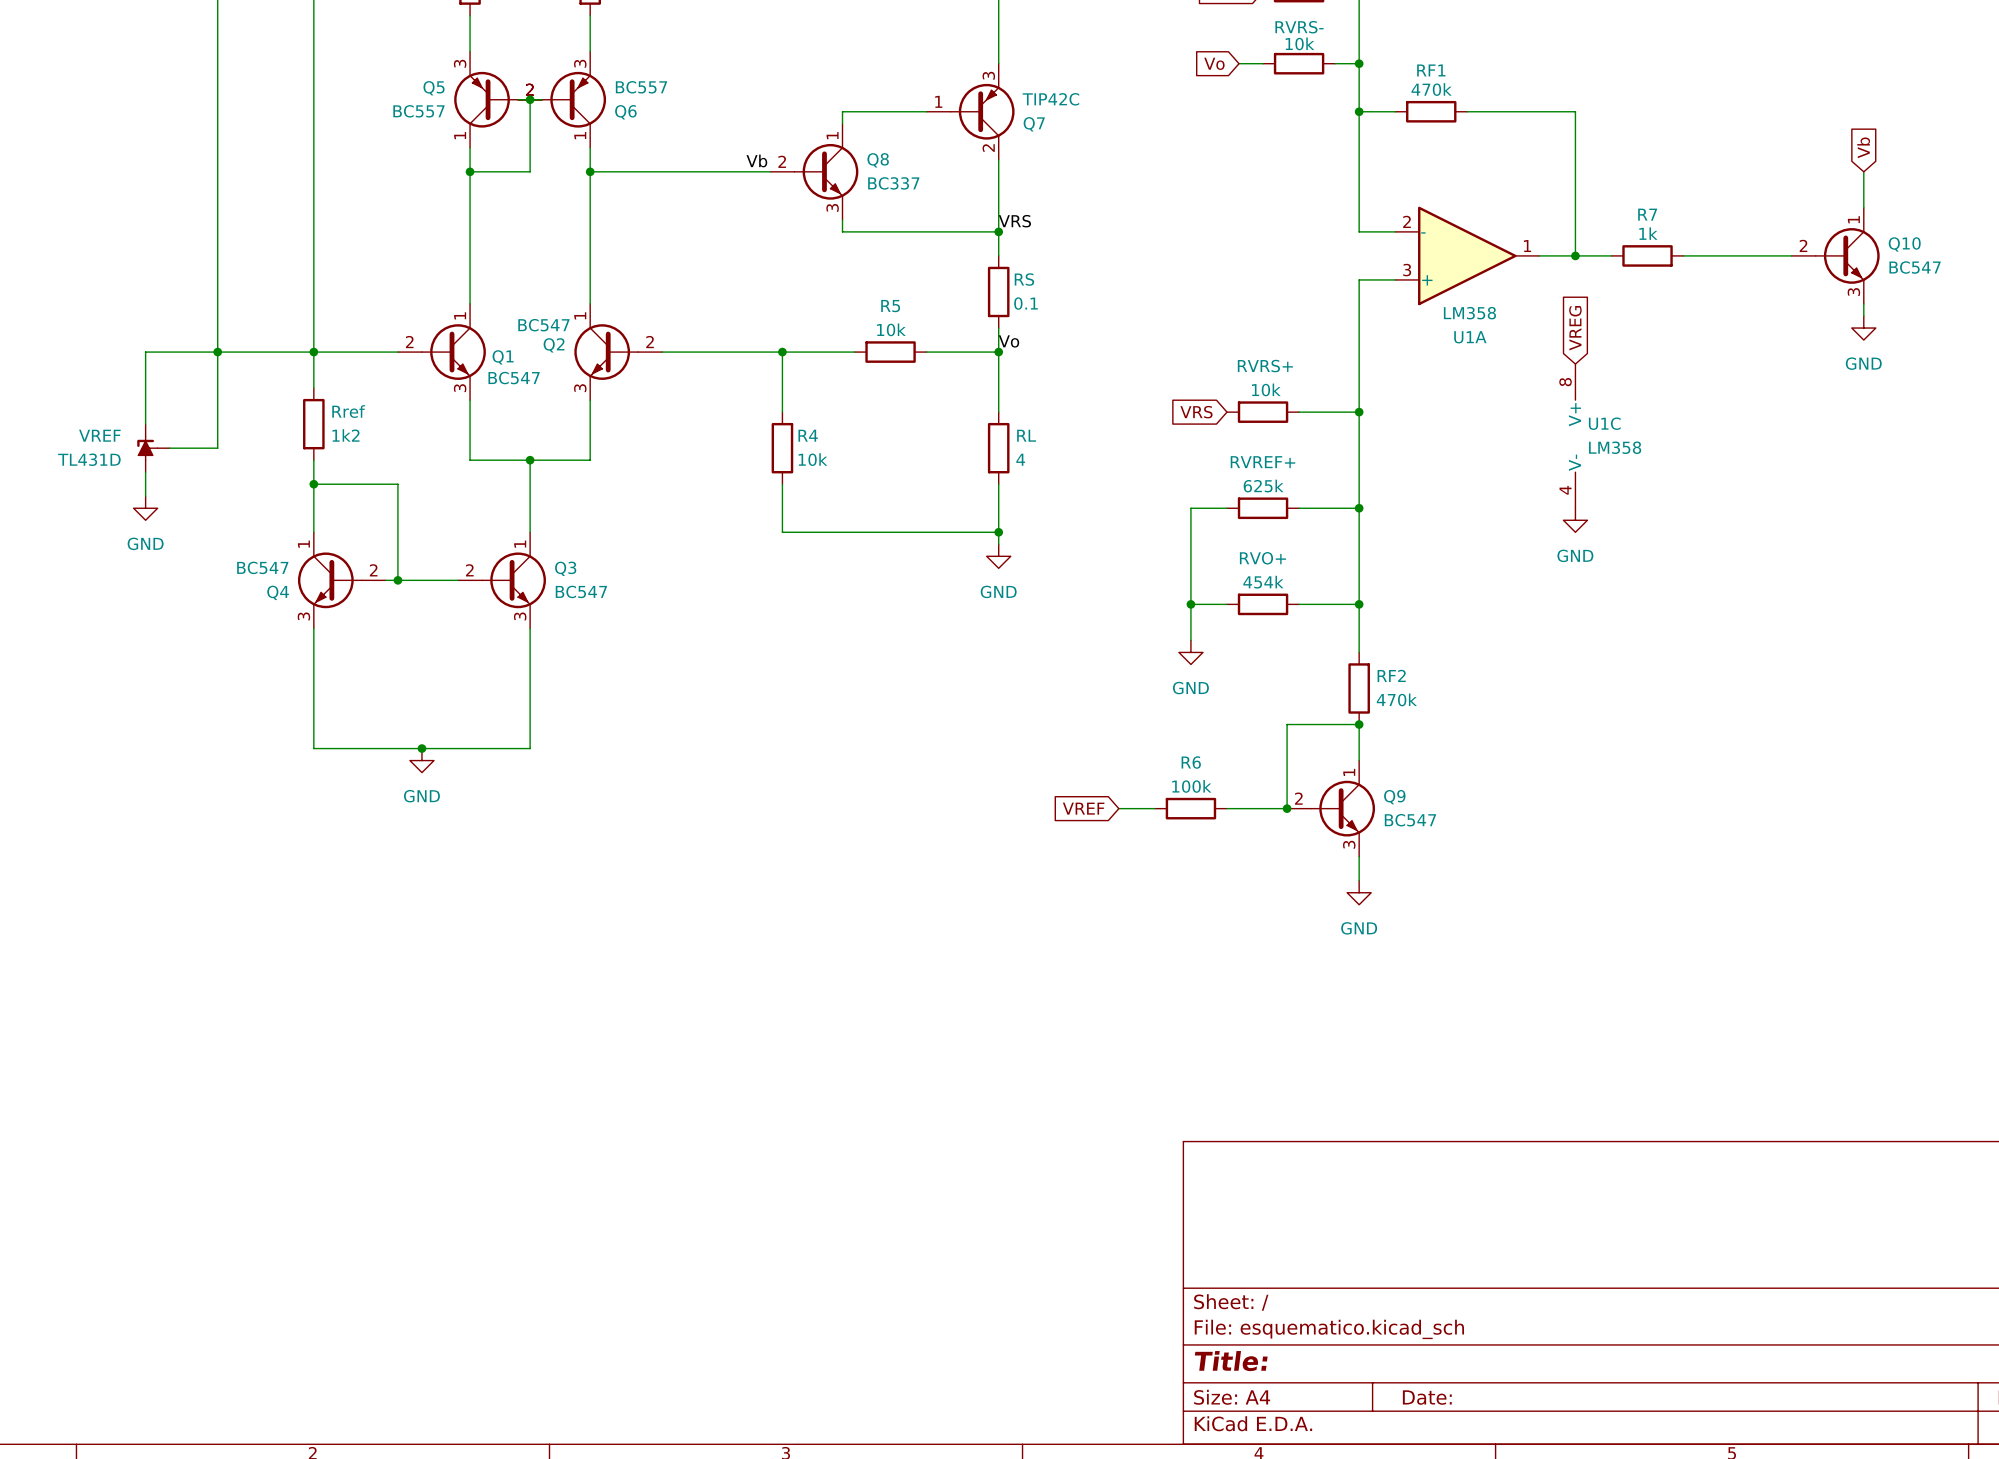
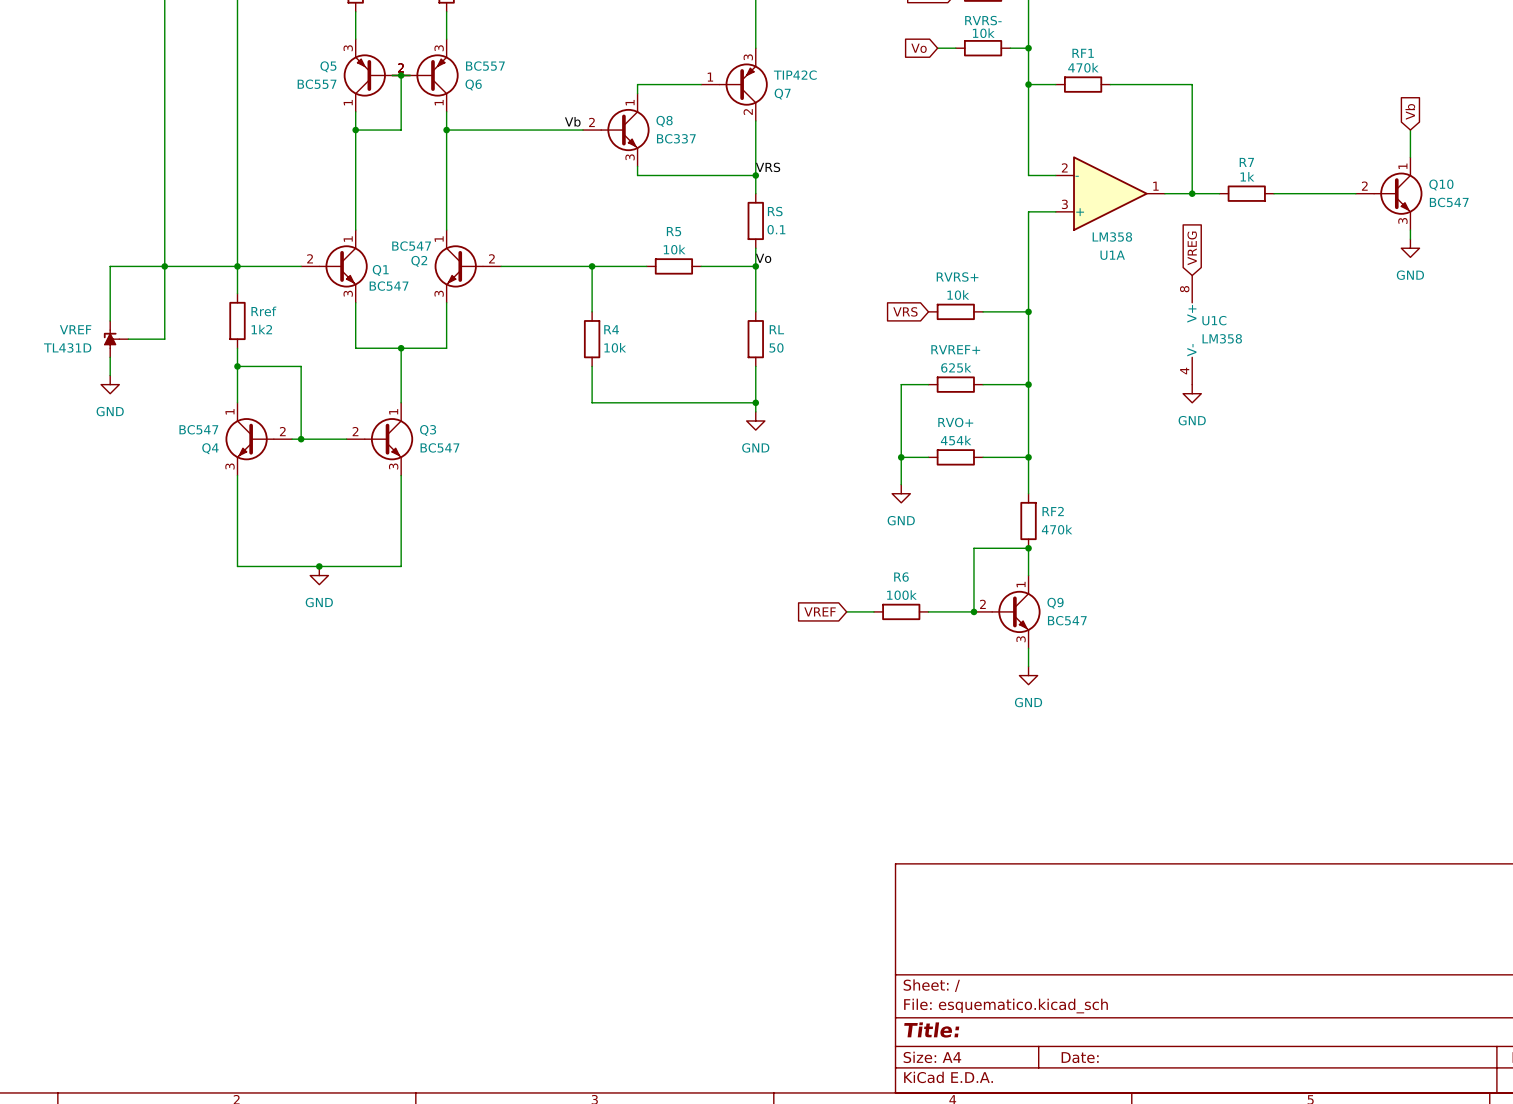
RL value: 4 (1020, 459) -> 50 (776, 347)

